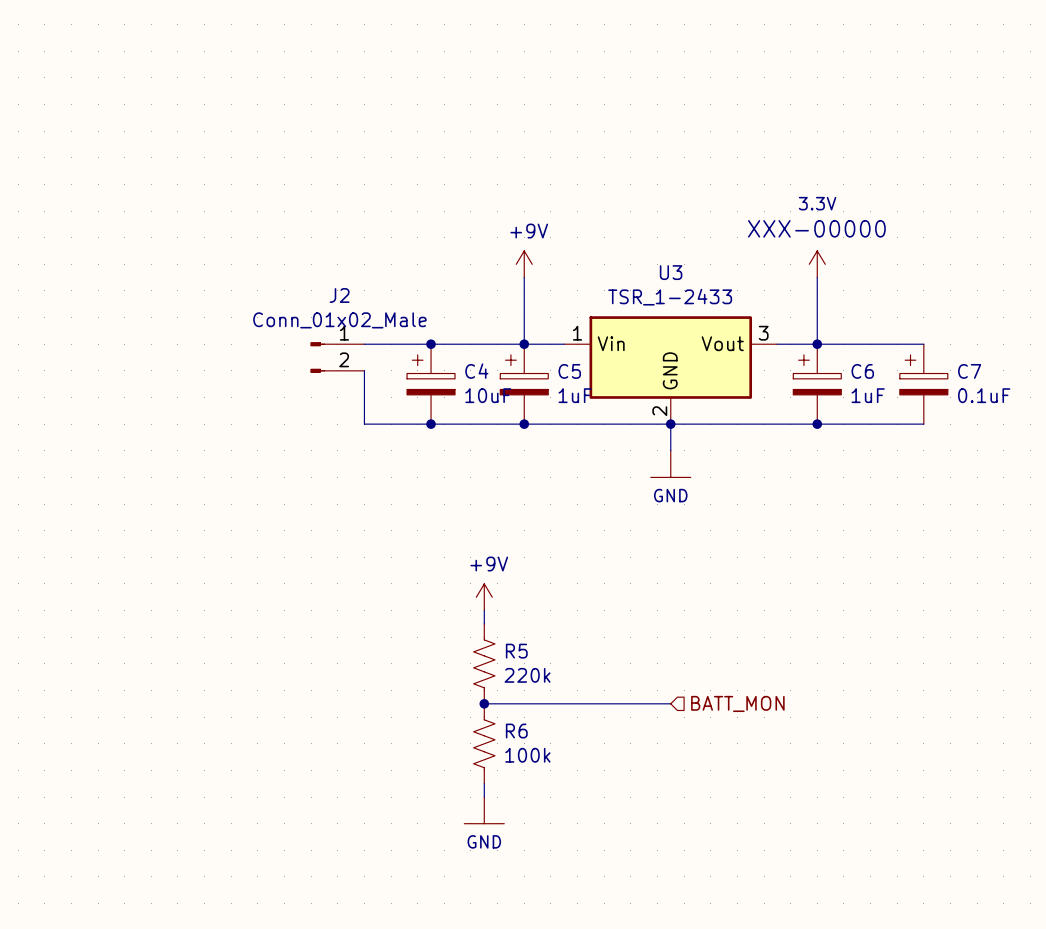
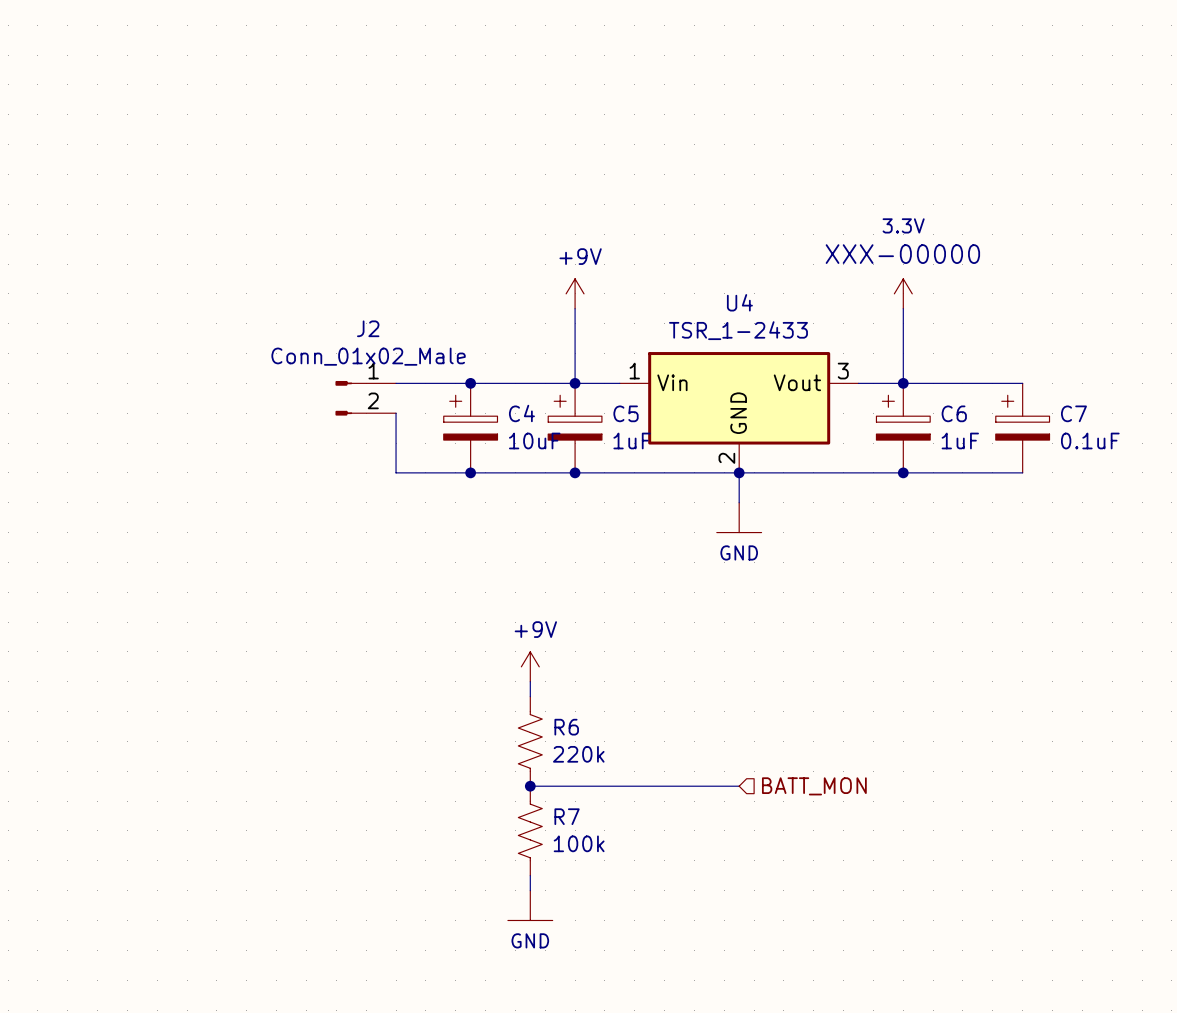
U3 name: U3 (671, 272) -> U4 (739, 302)
R5 name: R5 (516, 651) -> R6 (566, 727)
R6 name: R6 (516, 731) -> R7 (567, 816)

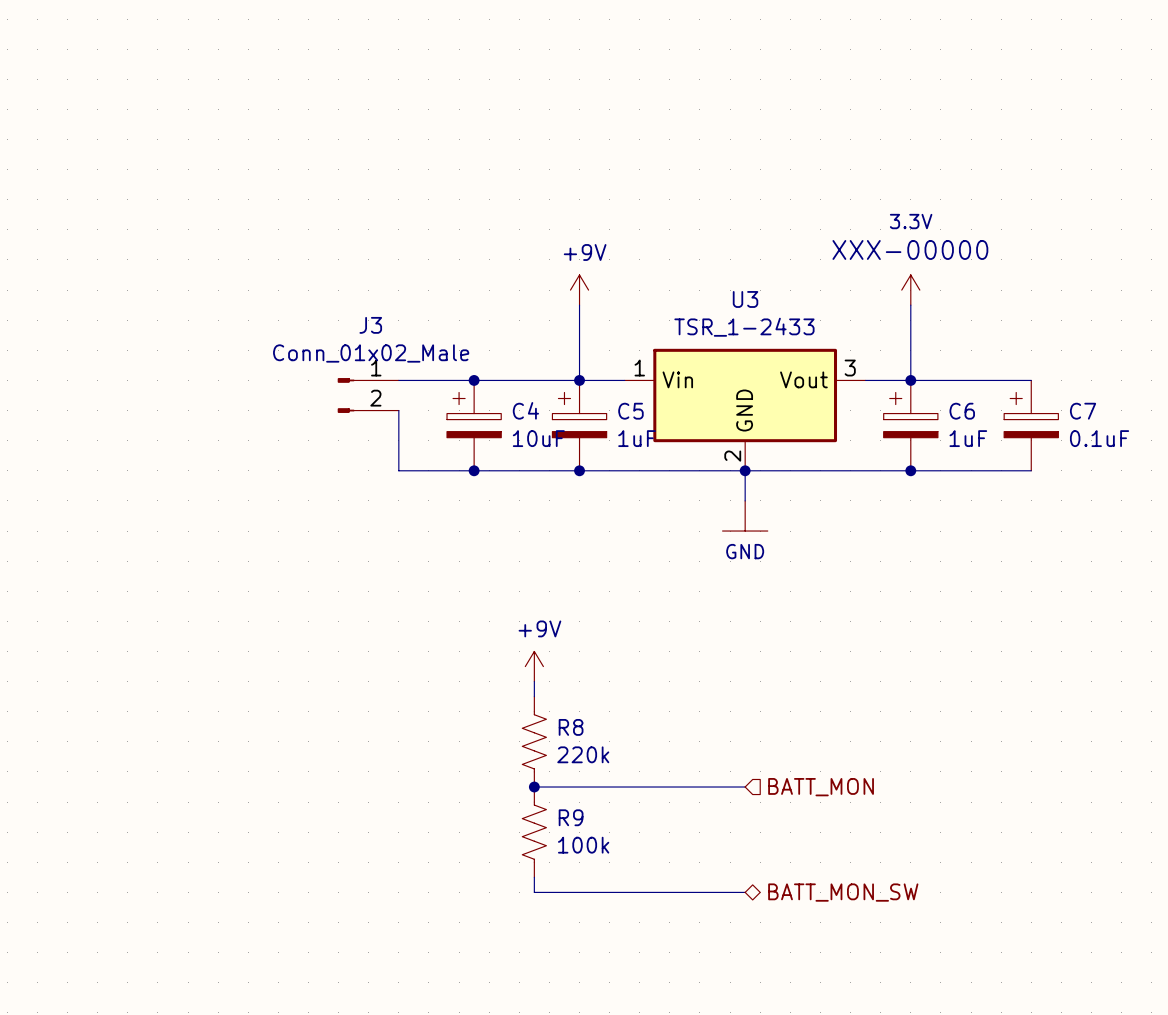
U4 name: U4 (739, 302) -> U3 (745, 299)
J2 name: J2 (368, 328) -> J3 (370, 325)
R6 name: R6 (566, 727) -> R8 (571, 727)
R7 name: R7 (567, 816) -> R9 (571, 817)
wire: none -> (534, 892) (745, 892)
hierarchical label: none -> BATT_MON_SW (843, 892)
power symbol: GND (530, 905) -> none

